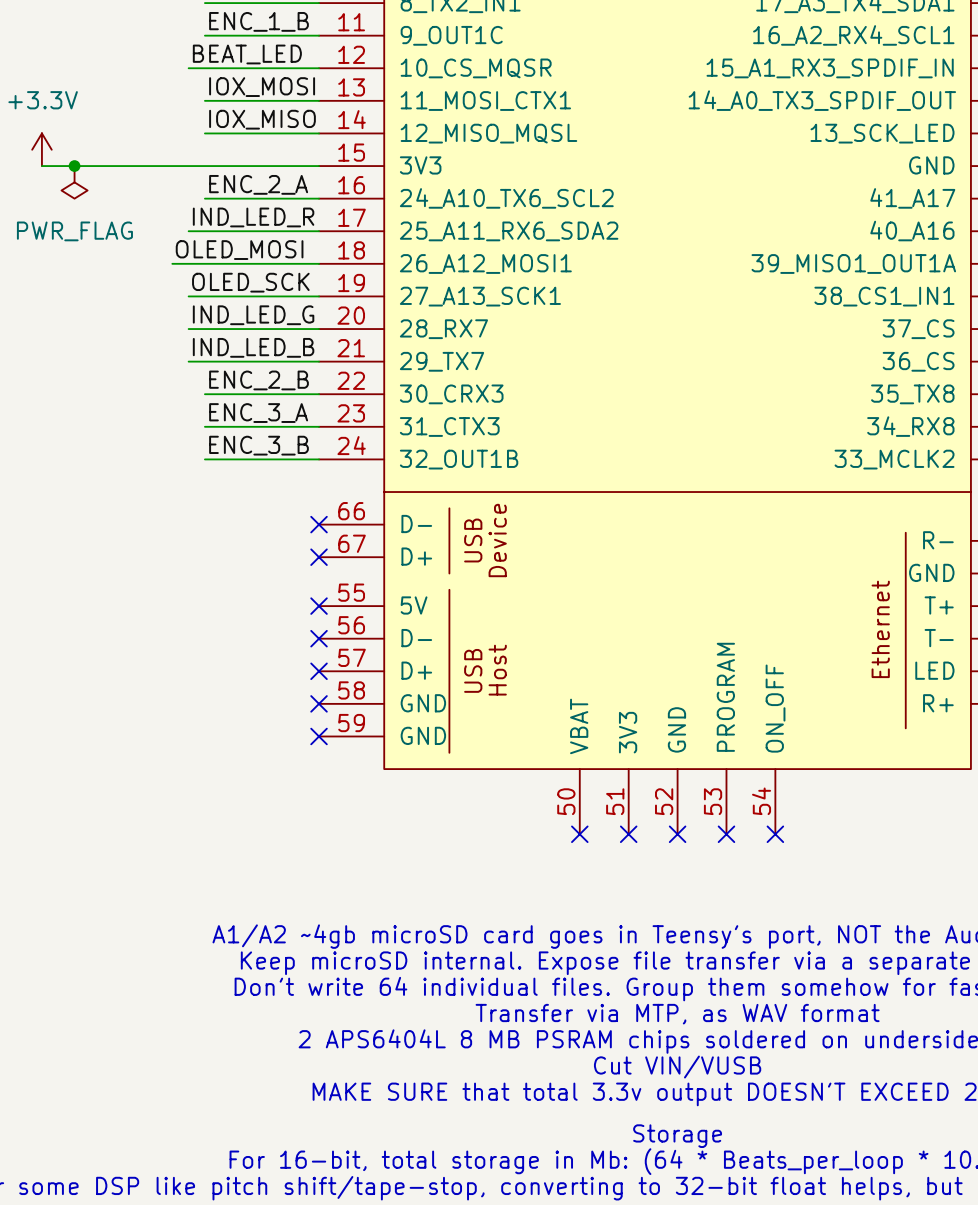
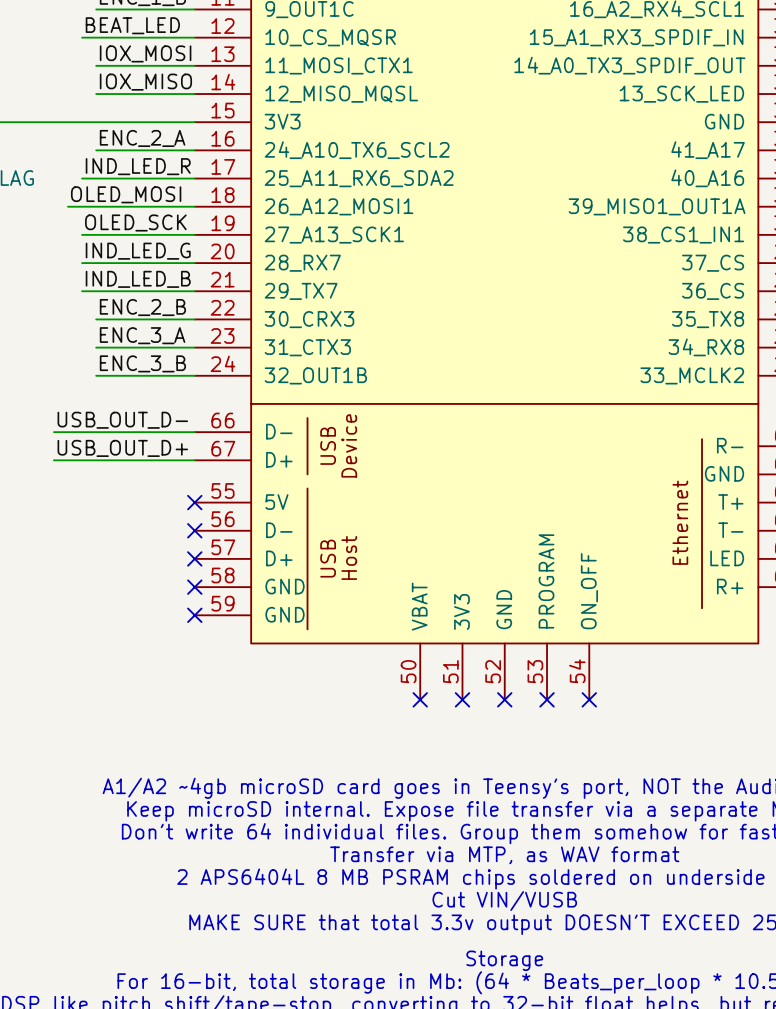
label: none -> USB_OUT_D- (122, 420)
wire: none -> (53, 432) (194, 432)
no-connect mark: (319, 524) -> none
label: none -> USB_OUT_D+ (122, 448)
wire: none -> (53, 460) (194, 460)
no-connect mark: (319, 557) -> none

